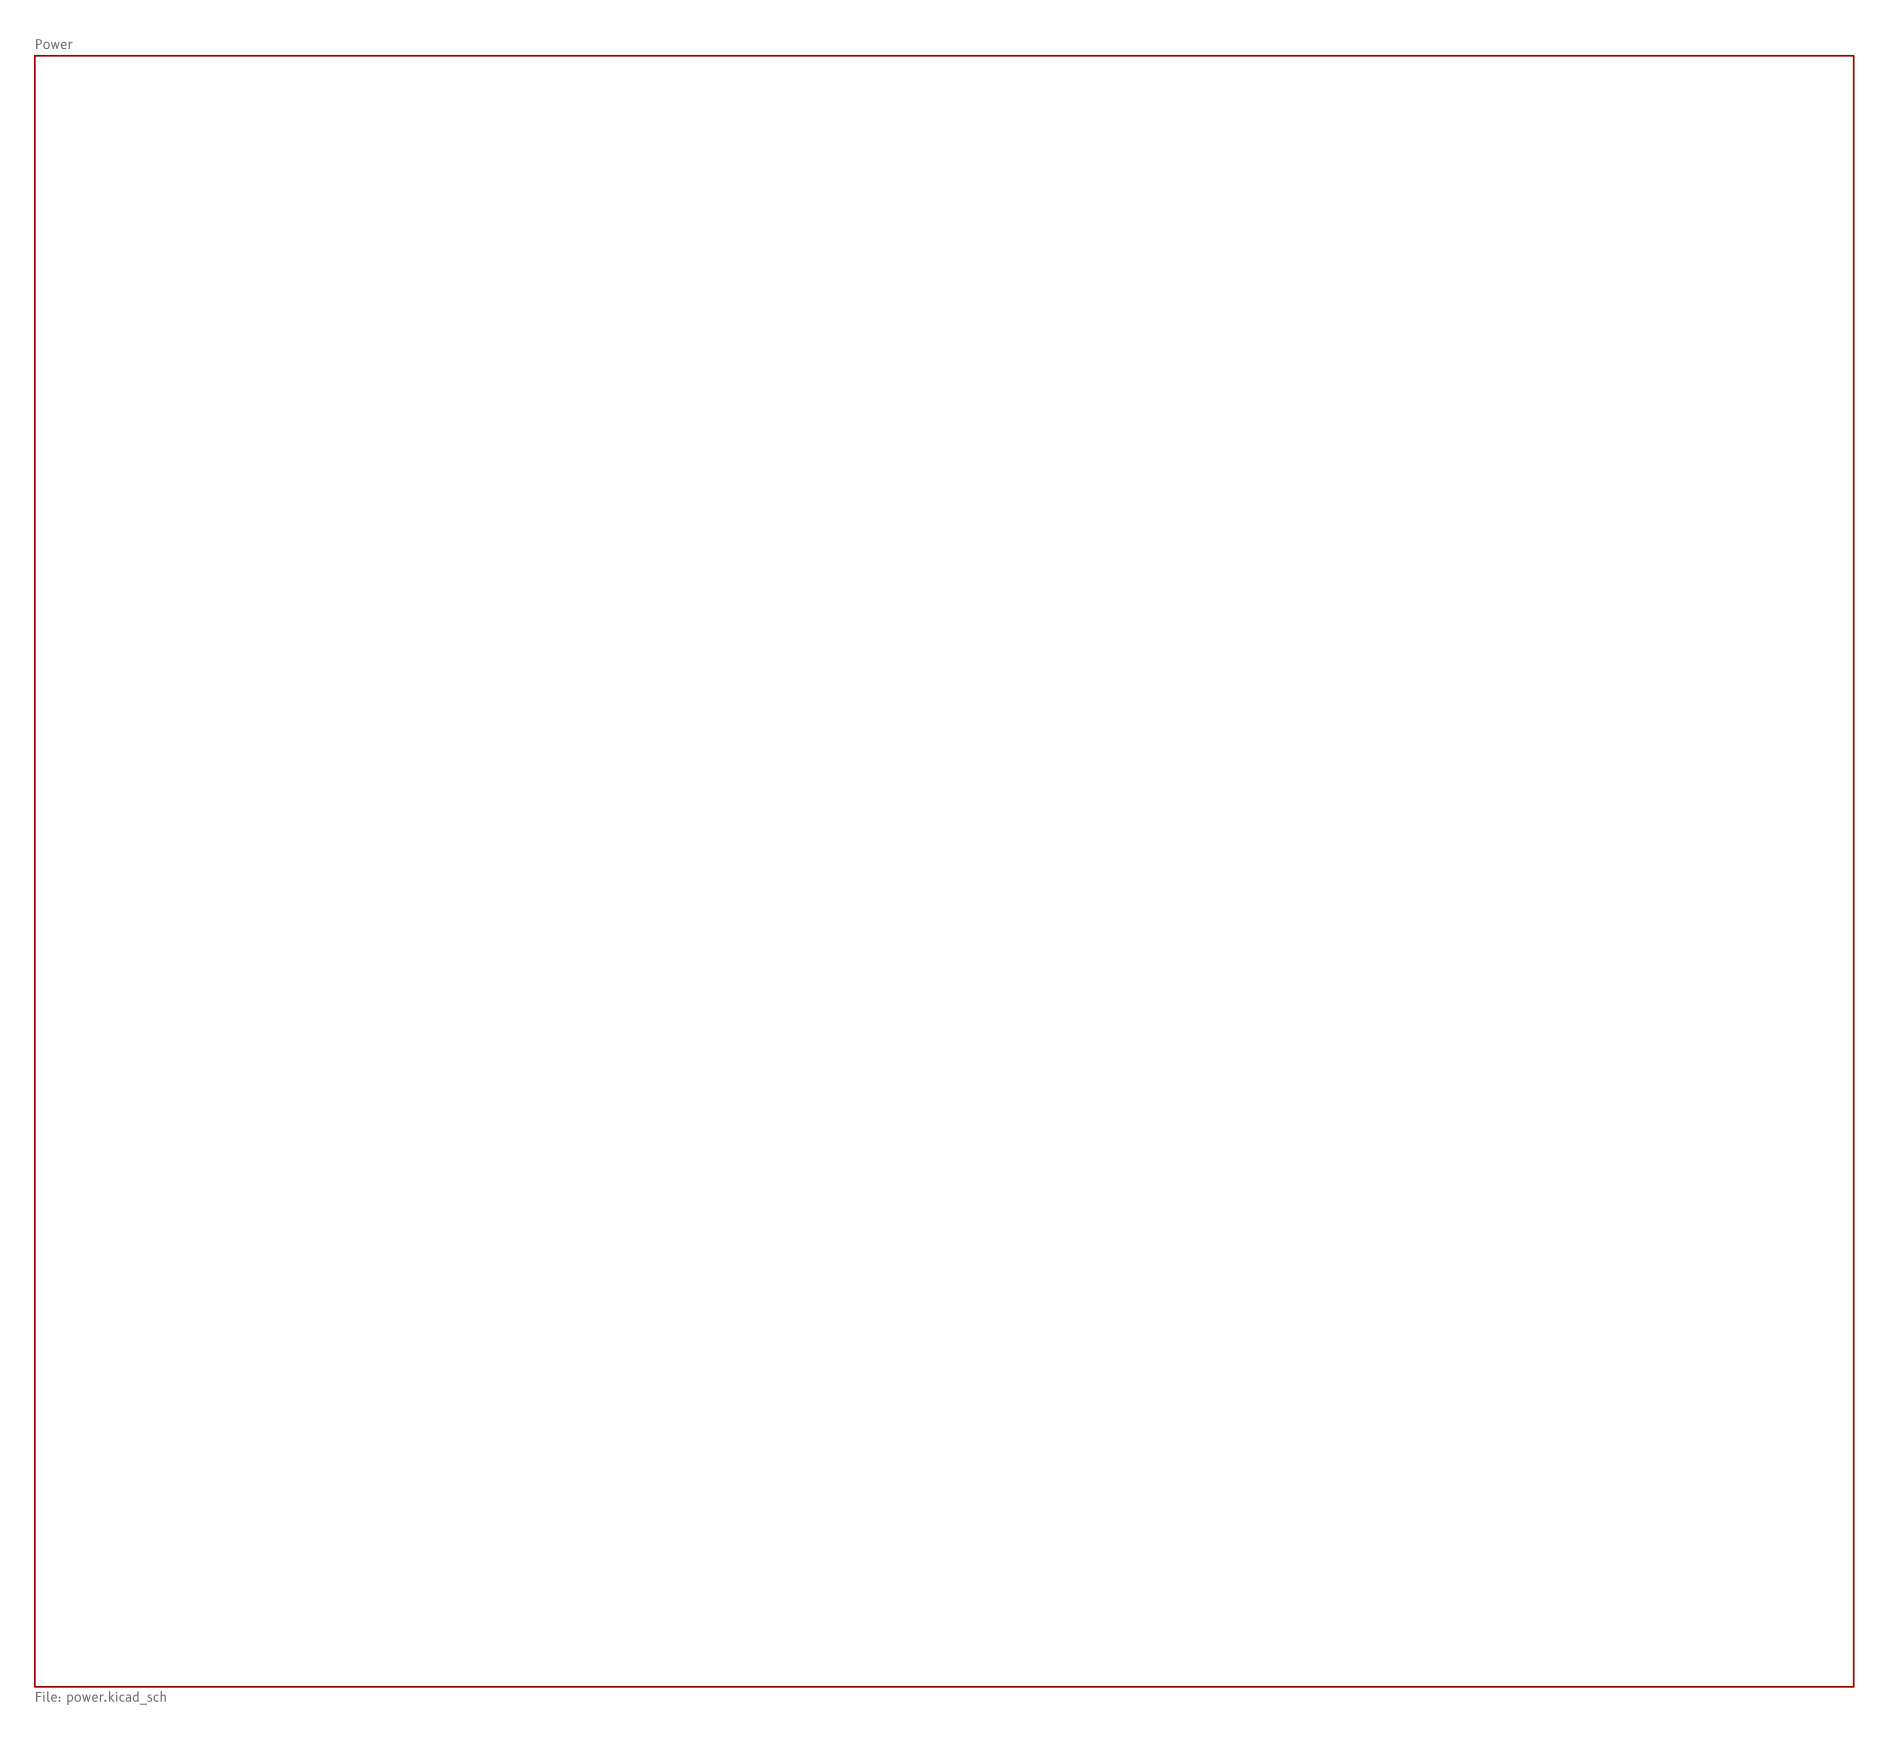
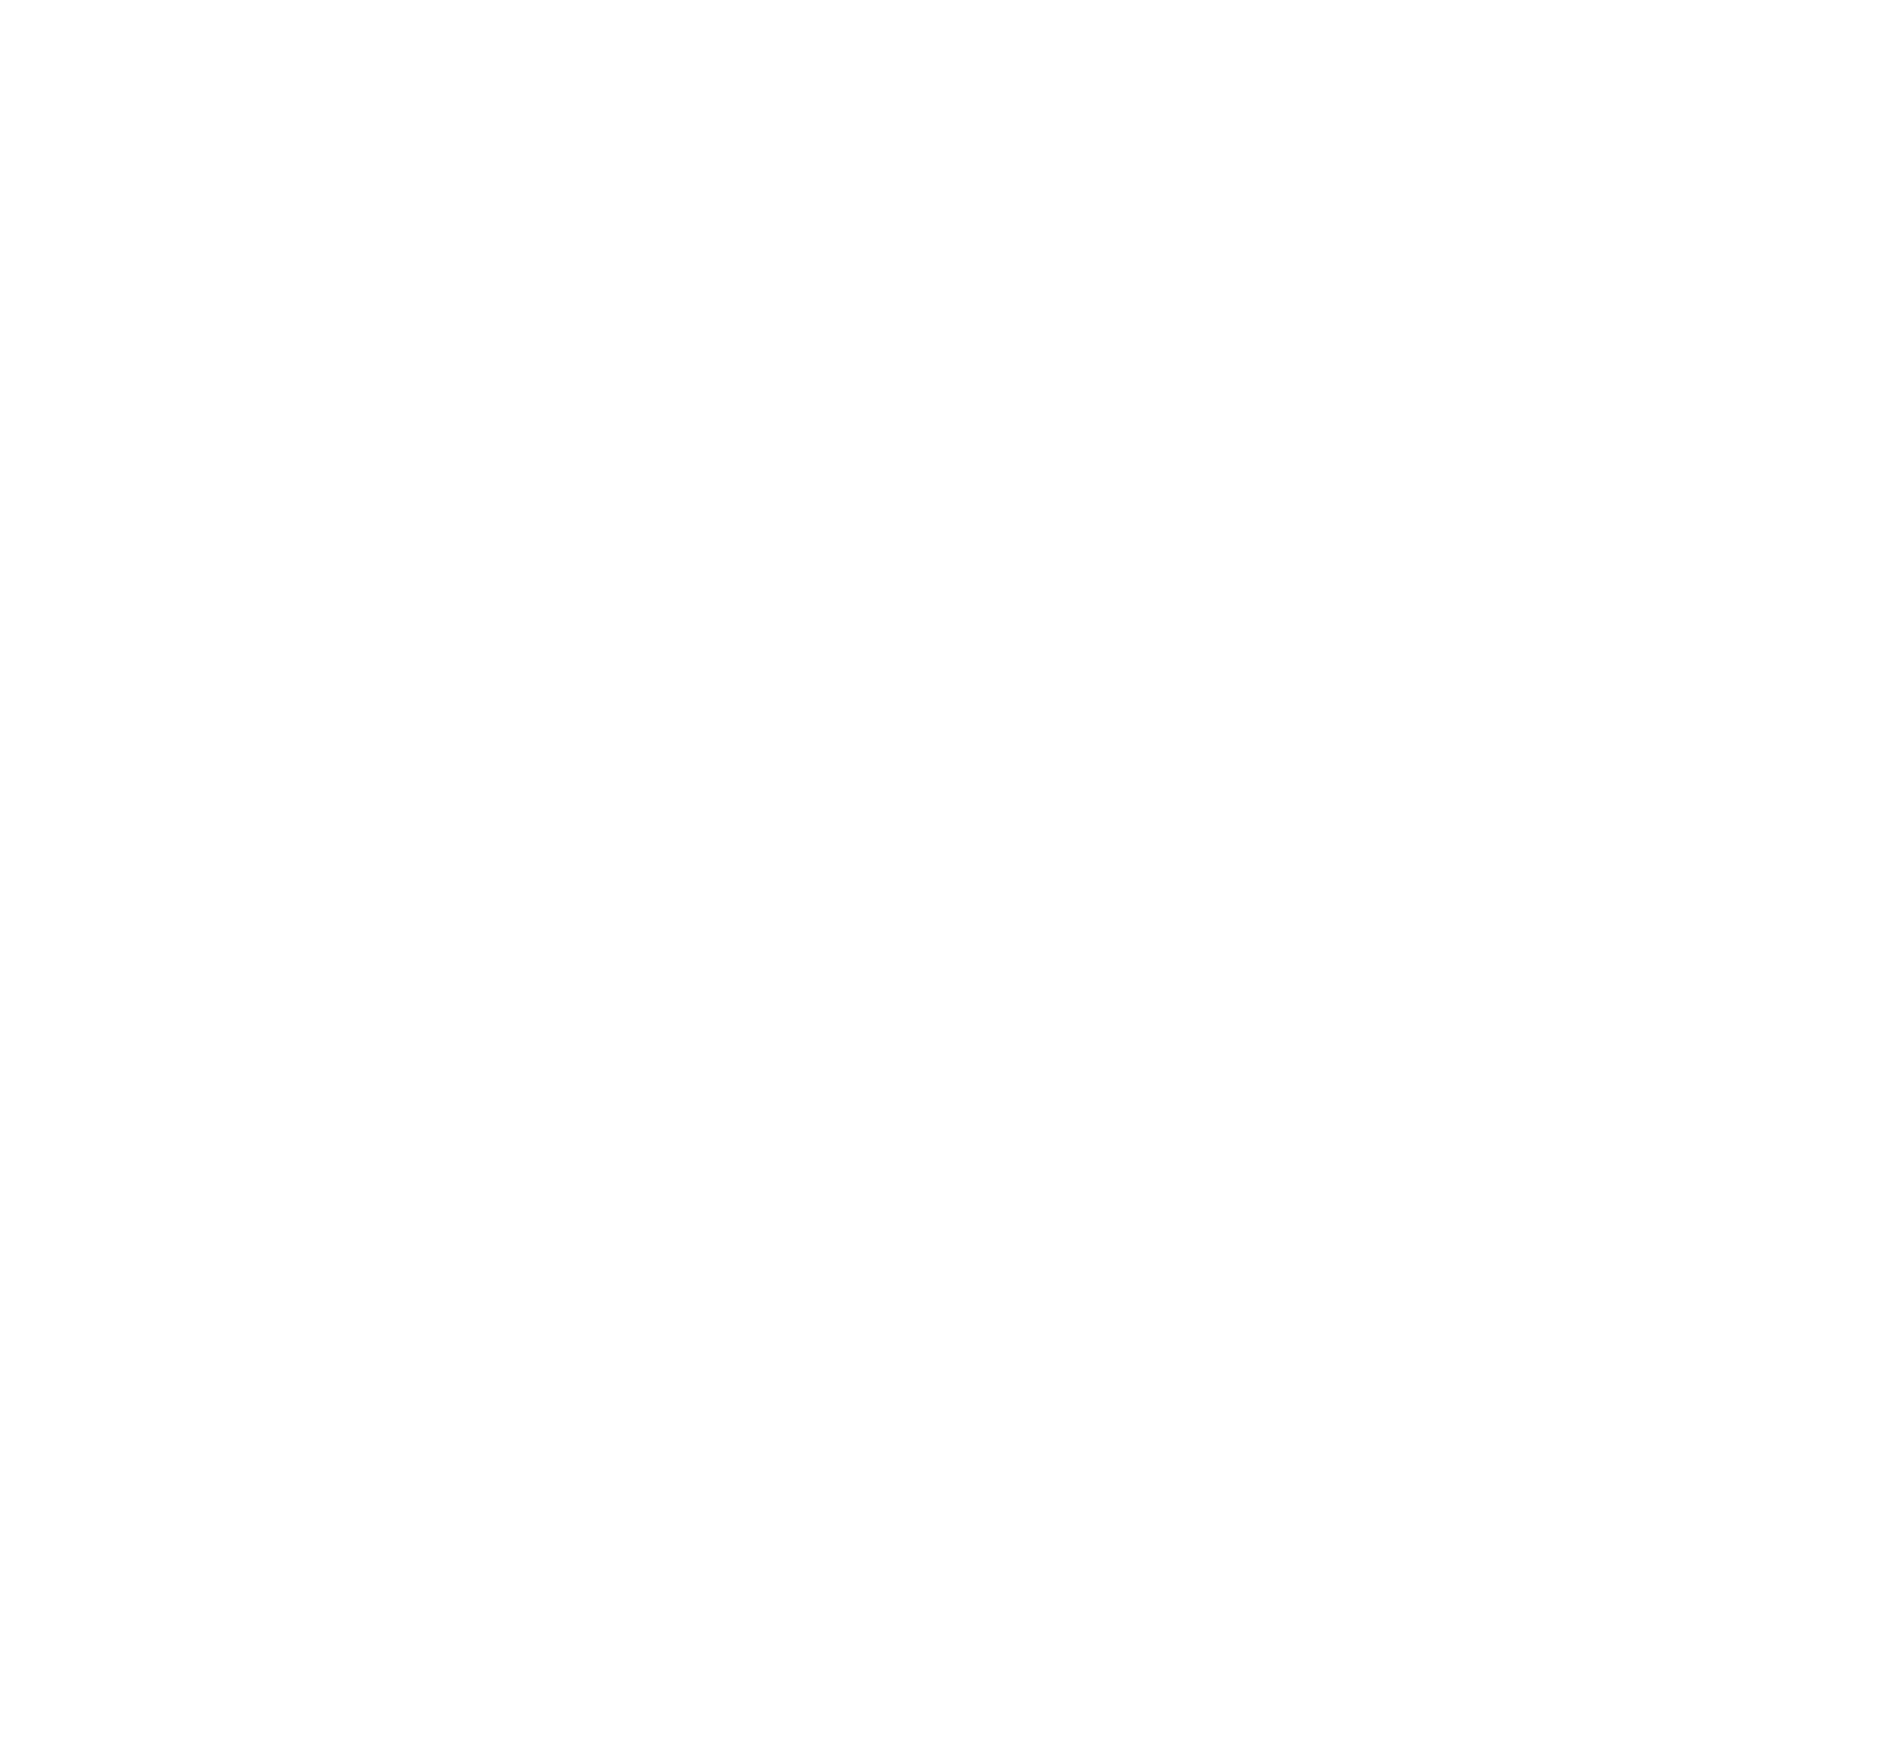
sheet Power: File: power.kicad_sch (944, 871) -> none

